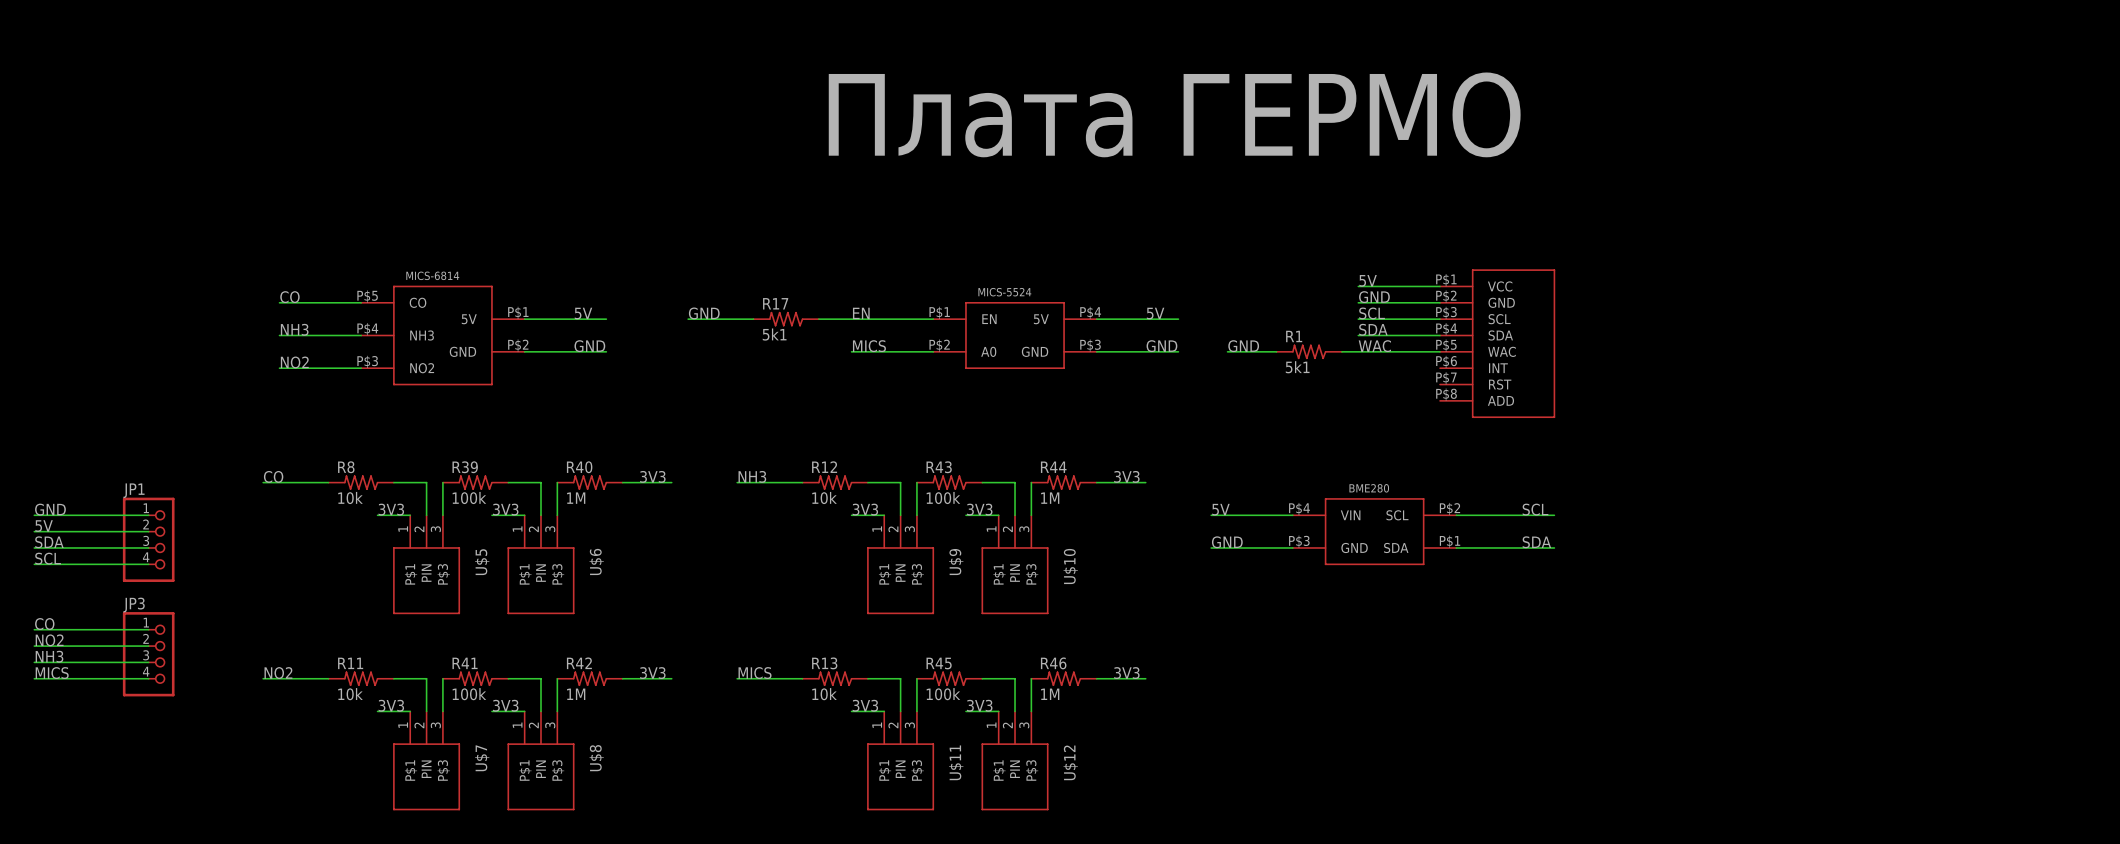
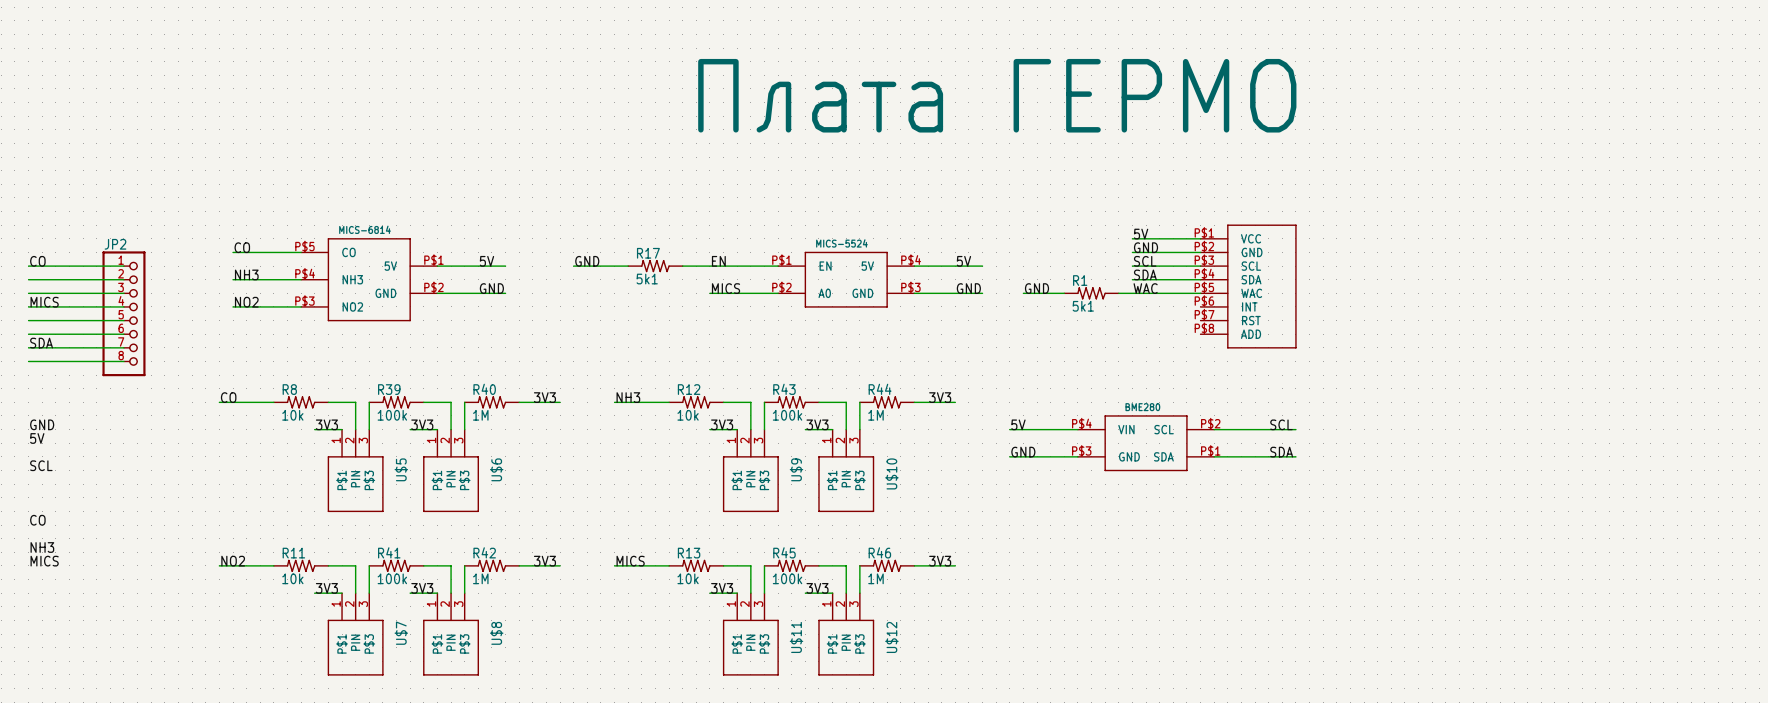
label: none -> CO (37, 261)
wire: none -> (28, 266) (123, 266)
wire: none -> (28, 279) (123, 279)
wire: none -> (28, 293) (123, 293)
label: none -> MICS (44, 302)
wire: none -> (28, 306) (123, 306)
JP2: none -> (123, 313)
wire: (34, 515) (148, 515) -> (28, 320) (123, 320)
wire: (34, 531) (148, 531) -> (28, 334) (123, 334)
JP1: (148, 539) -> none
label position: SDA (49, 542) -> SDA (41, 343)
wire: (34, 547) (148, 547) -> (28, 347) (123, 347)
wire: (34, 564) (148, 564) -> (28, 361) (123, 361)
wire: (34, 629) (148, 629) -> none
label: NO2 (49, 640) -> none
wire: (34, 646) (148, 646) -> none
JP3: (148, 654) -> none
wire: (34, 662) (148, 662) -> none
wire: (34, 678) (148, 678) -> none

